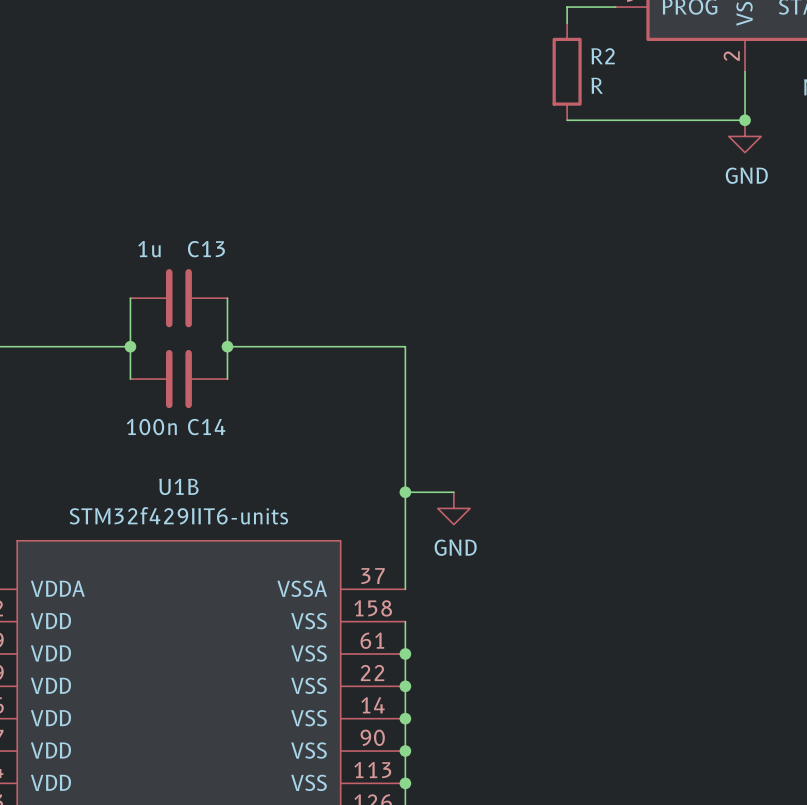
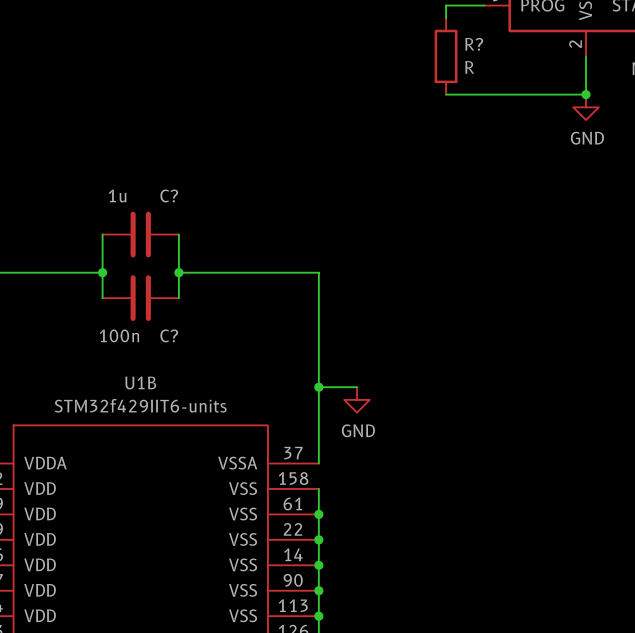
R2 name: R2 (603, 56) -> R? (474, 44)
C13 name: C13 (206, 249) -> C? (169, 195)
C14 name: C14 (206, 427) -> C? (169, 335)

